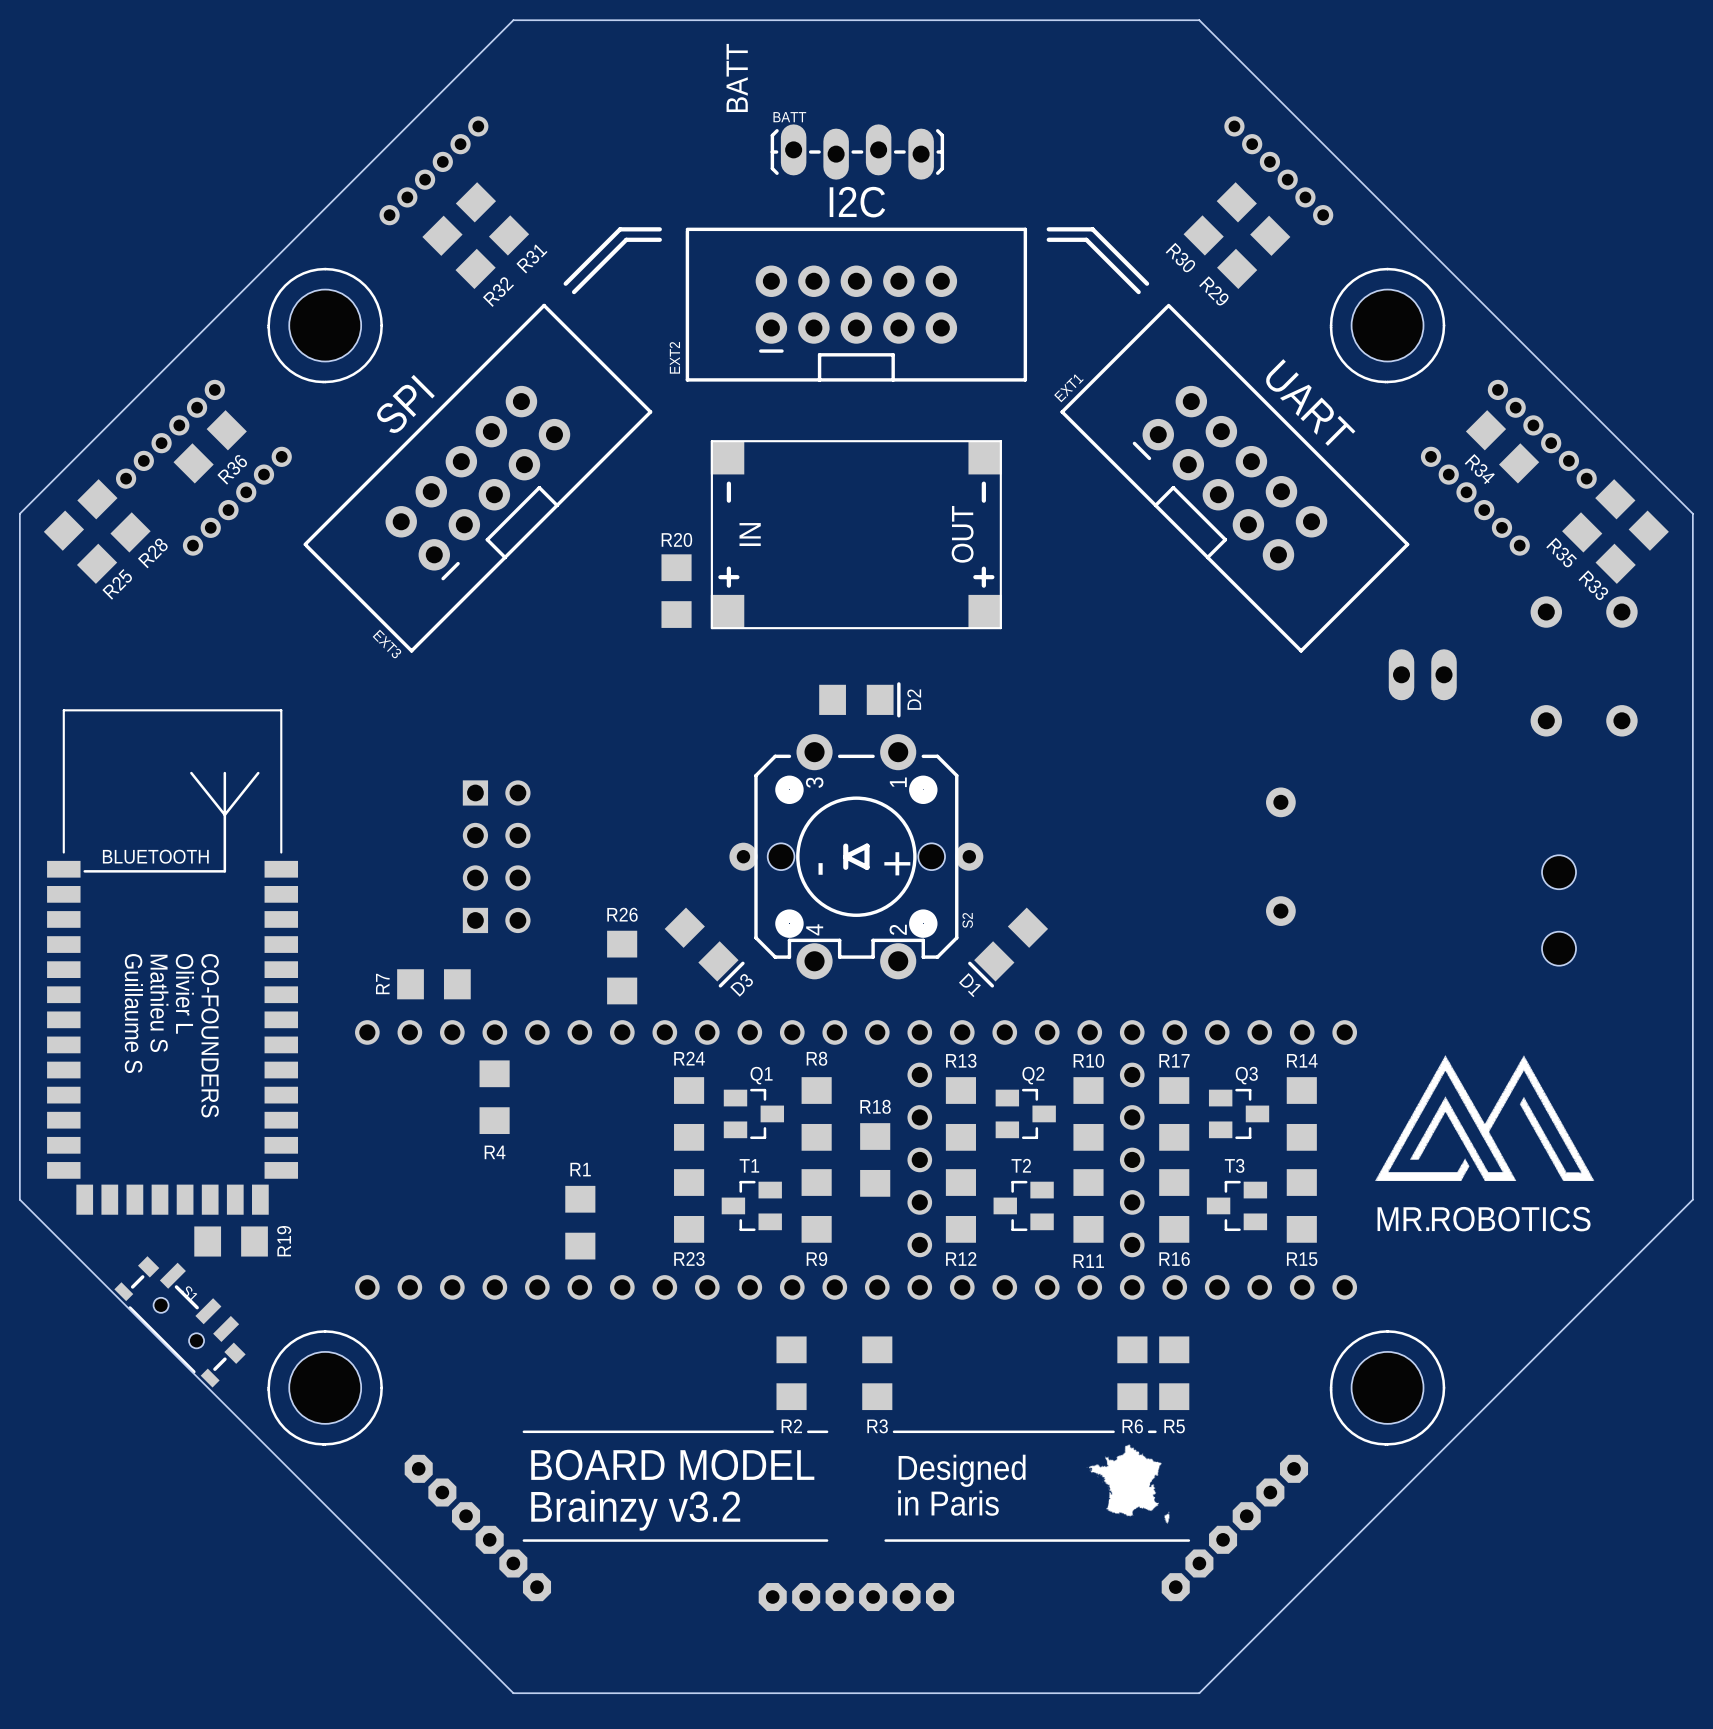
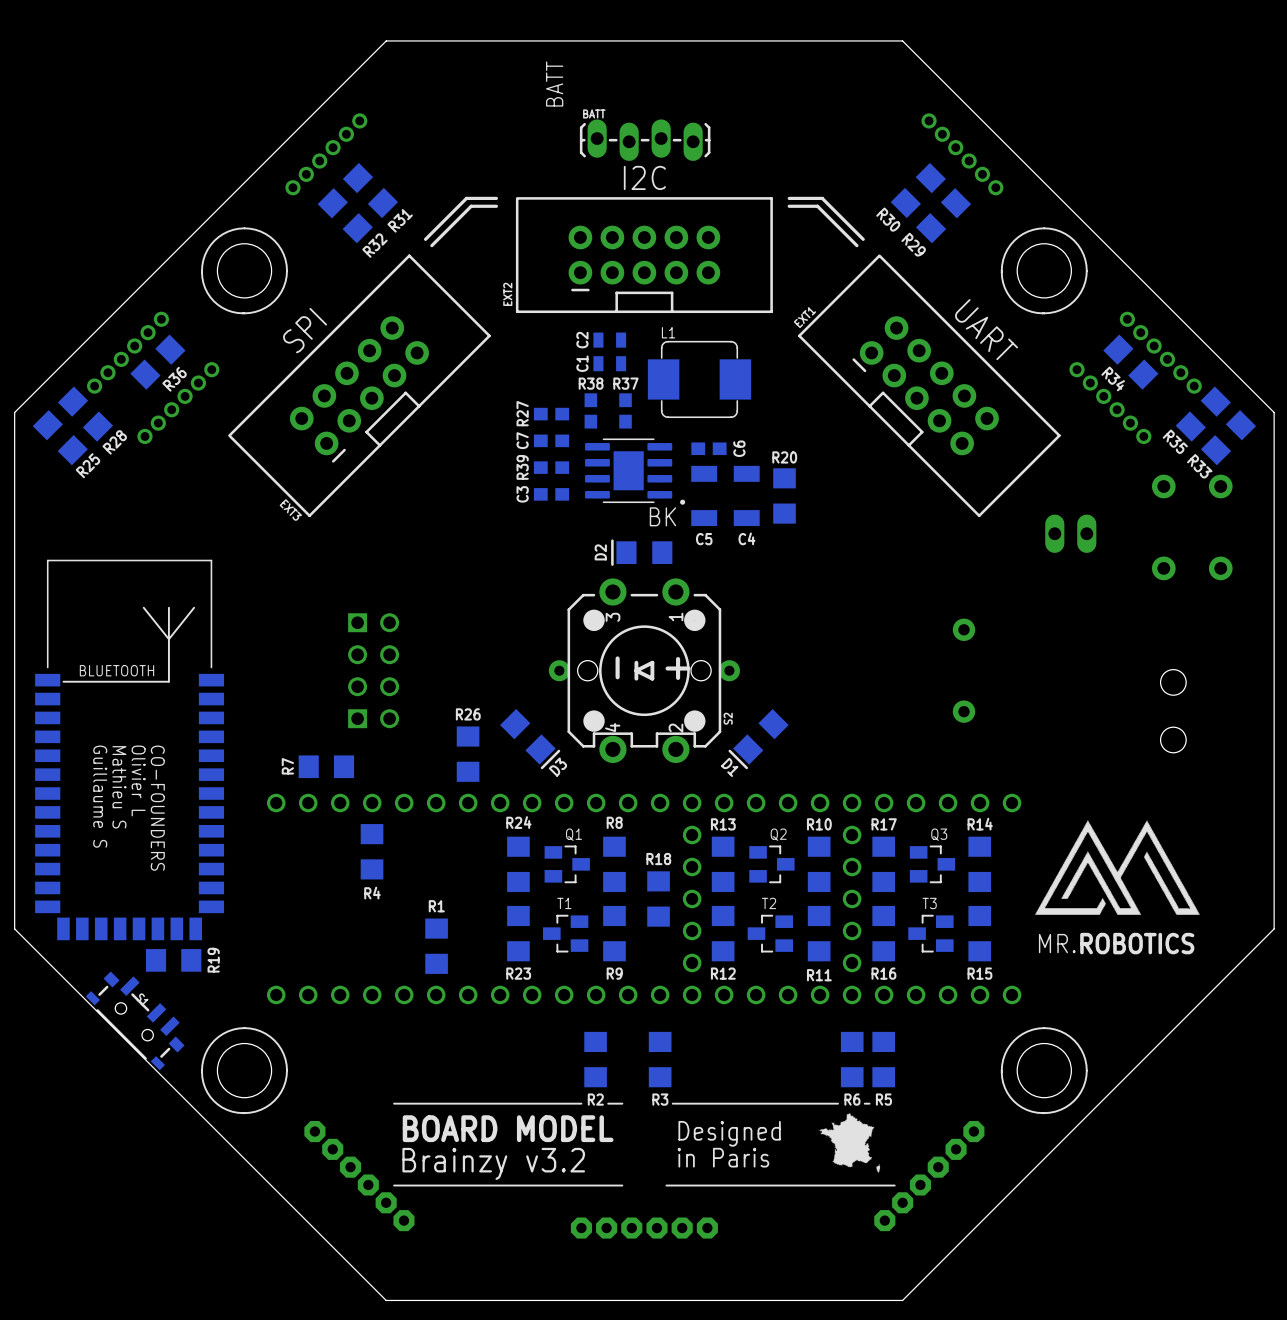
C2: none -> (609, 340)
C1: none -> (609, 363)
L1: none -> (699, 379)
R38: none -> (590, 410)
R37: none -> (625, 410)
R27: none -> (551, 414)
part: (856, 534) -> none
C7: none -> (551, 440)
C6: none -> (708, 448)
R39: none -> (551, 467)
R20 position: (676, 591) -> (784, 495)
BK: none -> (635, 471)
C3: none -> (551, 494)
C5: none -> (704, 495)
C4: none -> (746, 495)
D2 rotation: 0° (859, 699) -> 180° (641, 552)

